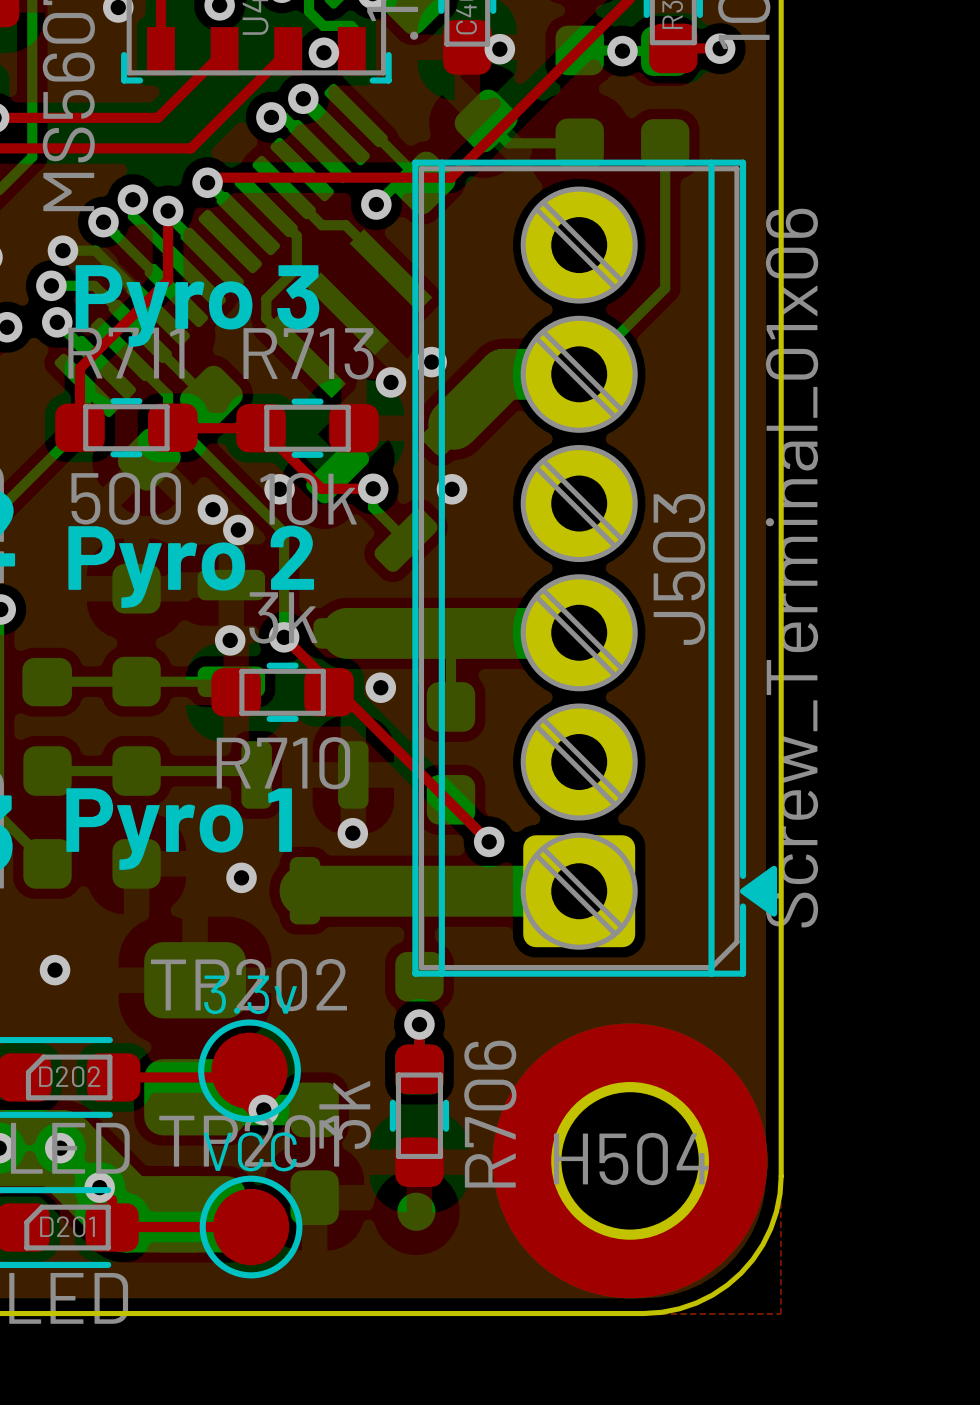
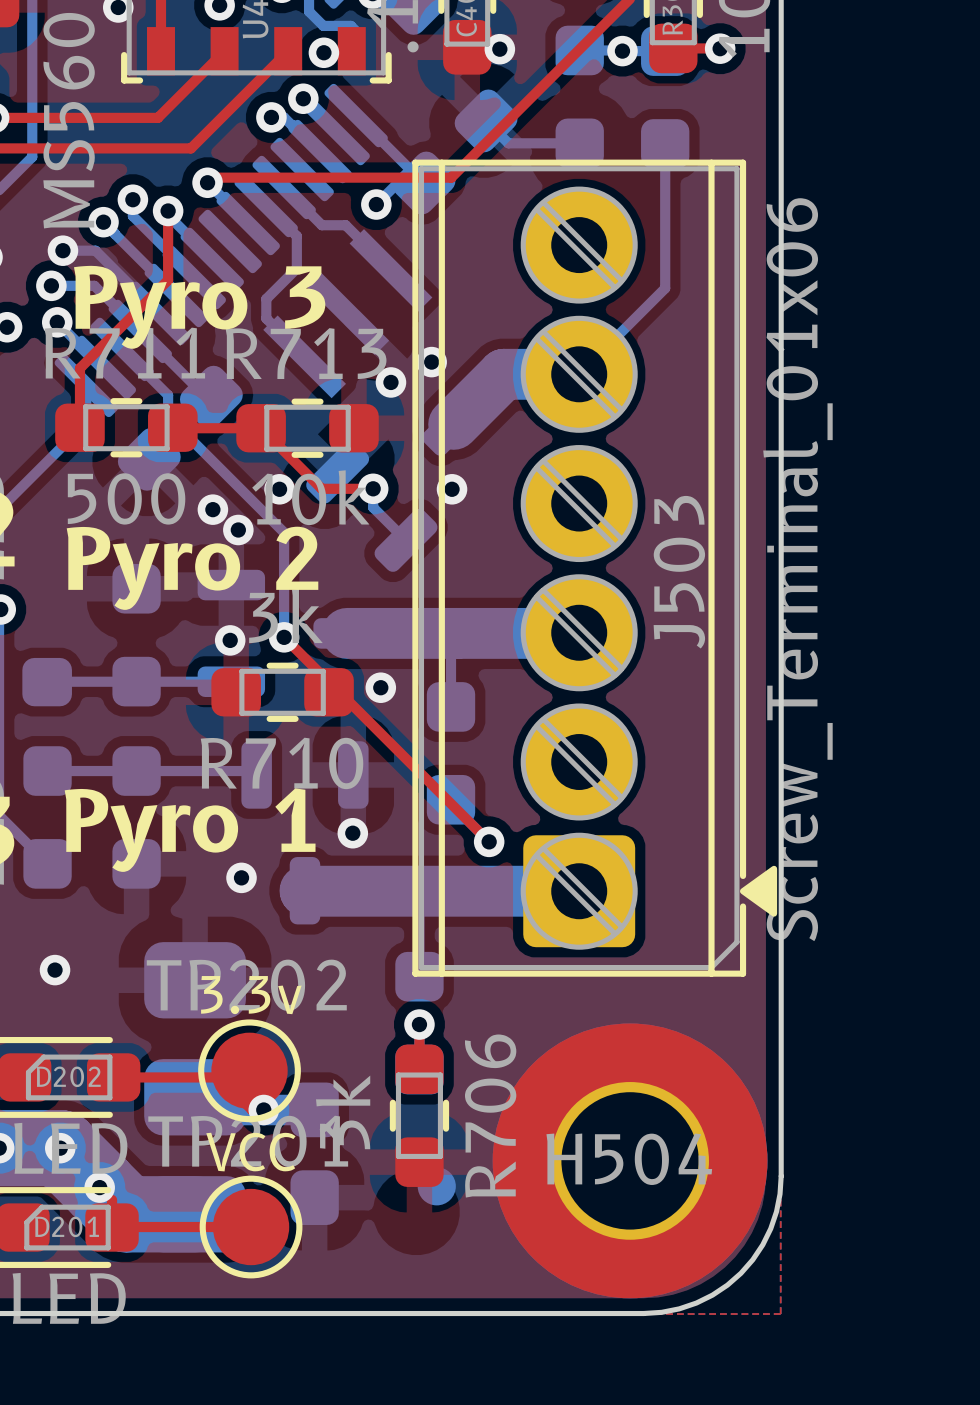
part position: (416, 1211) -> (436, 1186)

